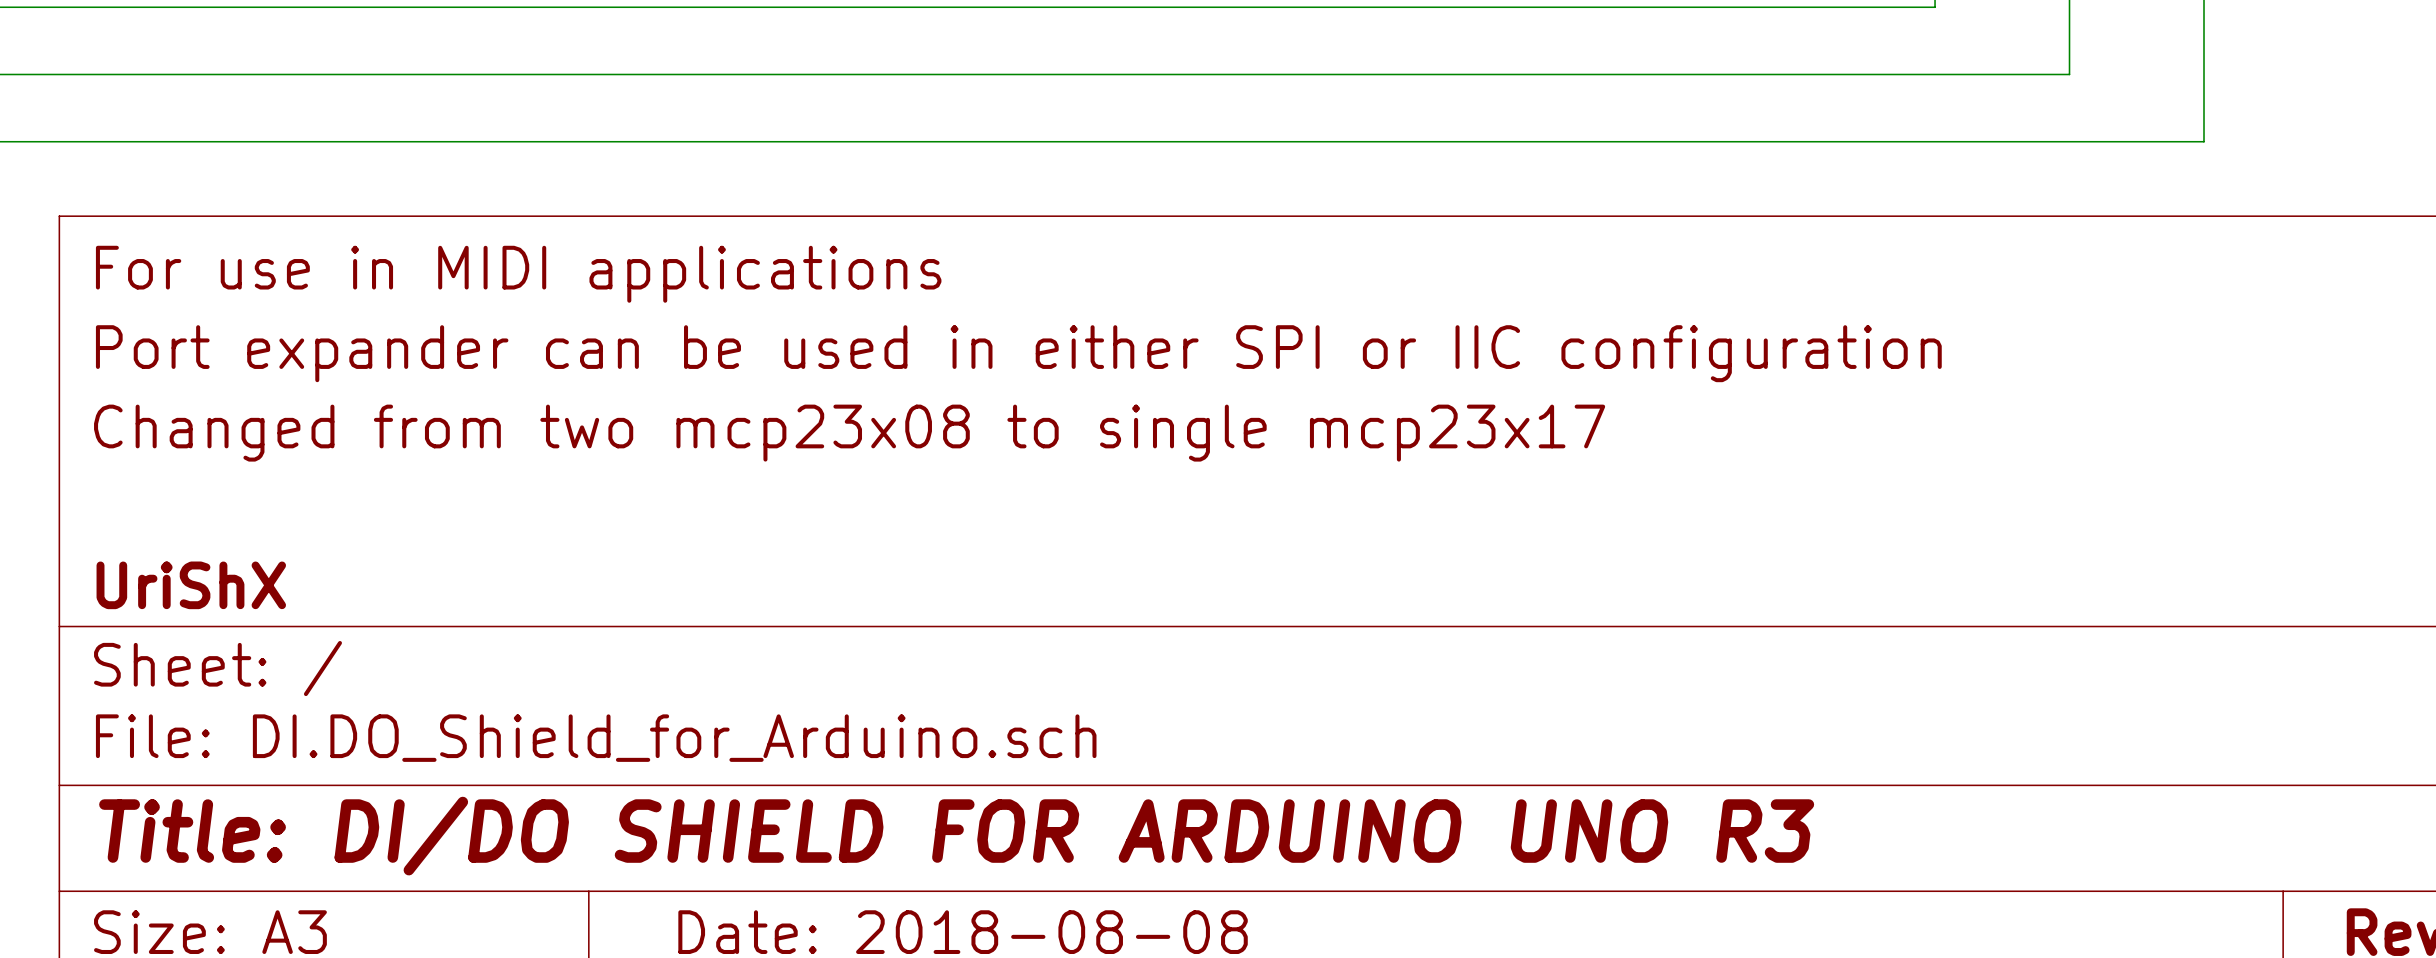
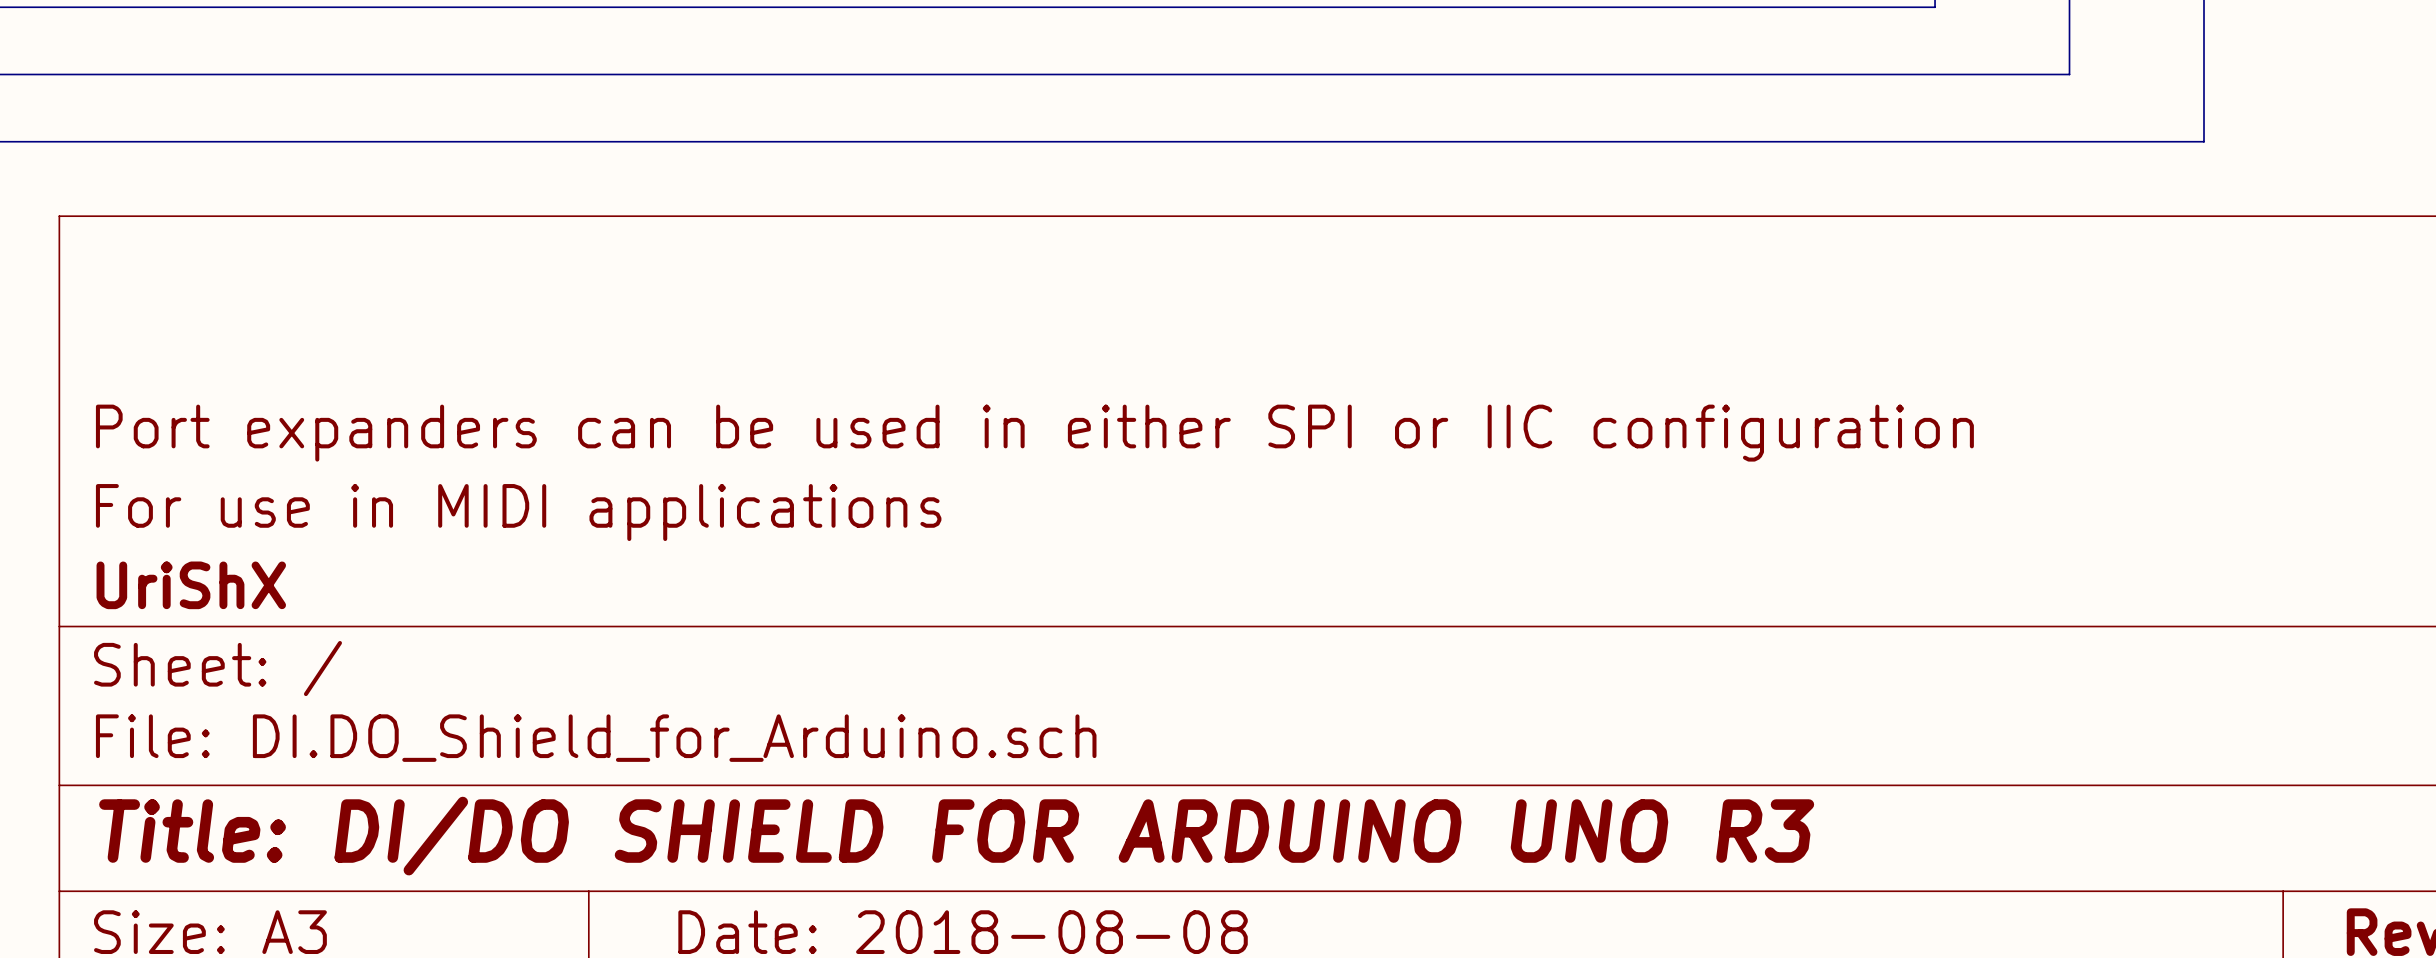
title block position: For use in MIDI applications (518, 274) -> For use in MIDI applications (518, 512)
title block: Port expander can be used in either SPI or IIC configuration (1018, 353) -> none
title block: Changed from two mcp23x08 to single mcp23x17 (849, 433) -> Port expanders can be used in either SPI or IIC configuration (1034, 433)

